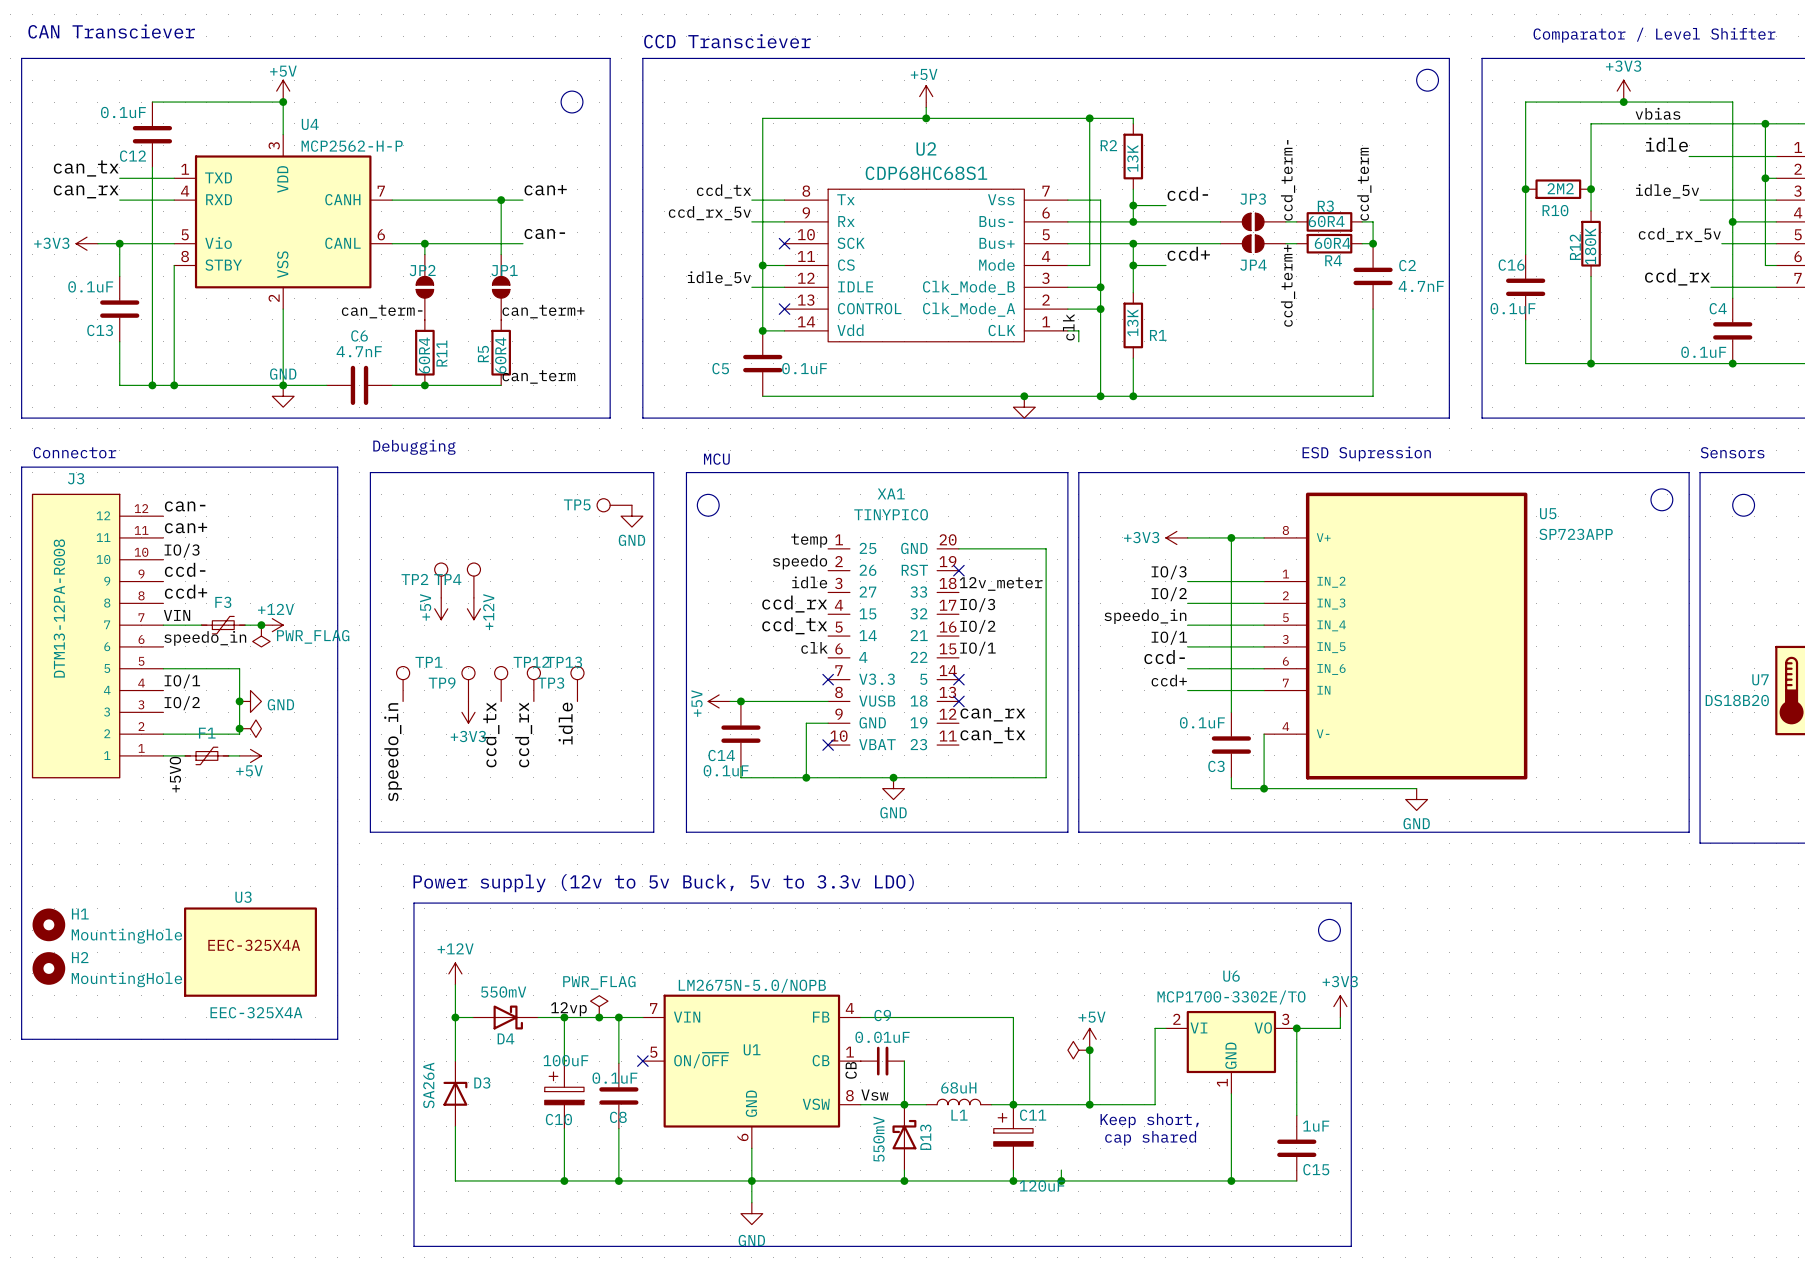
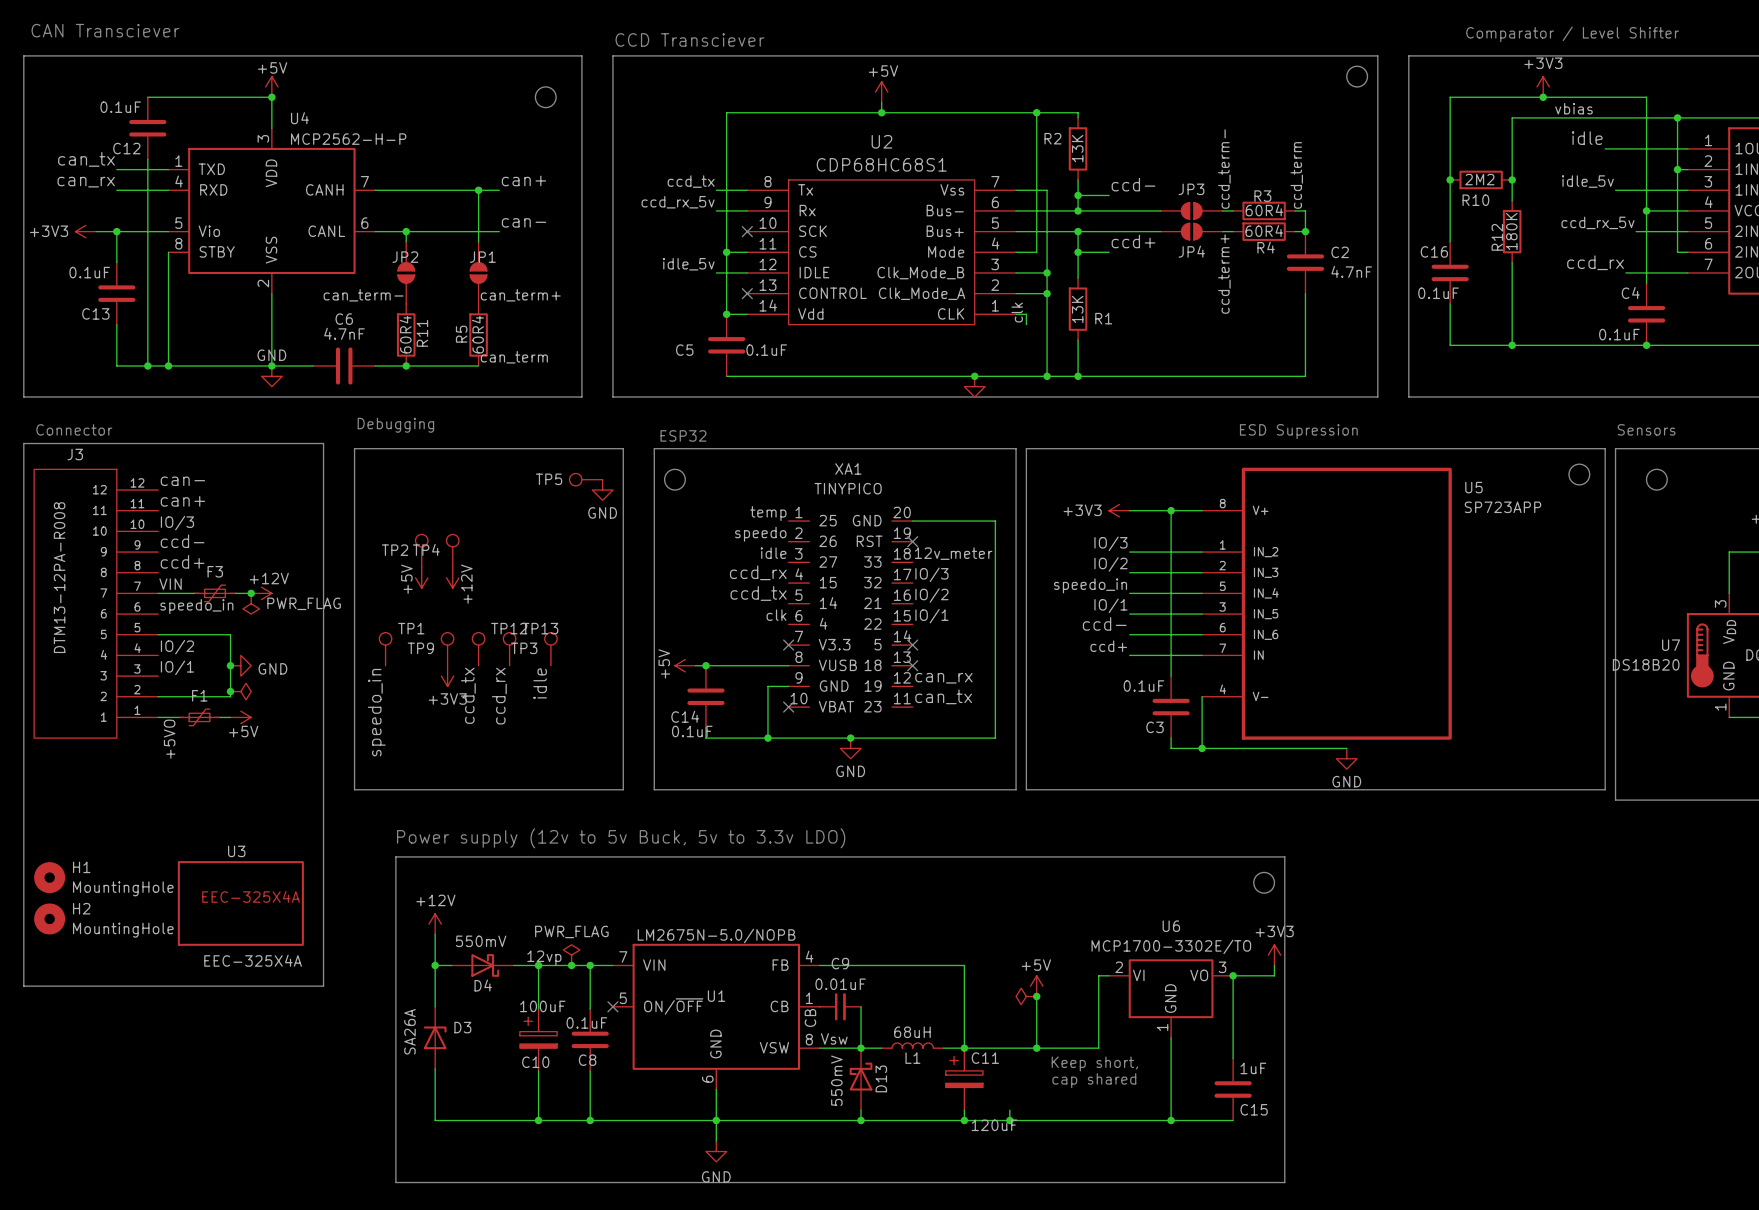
text: MCU (716, 459) -> ESP32 (683, 435)
label: IO/1 (182, 681) -> IO/2 (177, 647)
label: IO/2 (182, 703) -> IO/1 (177, 667)

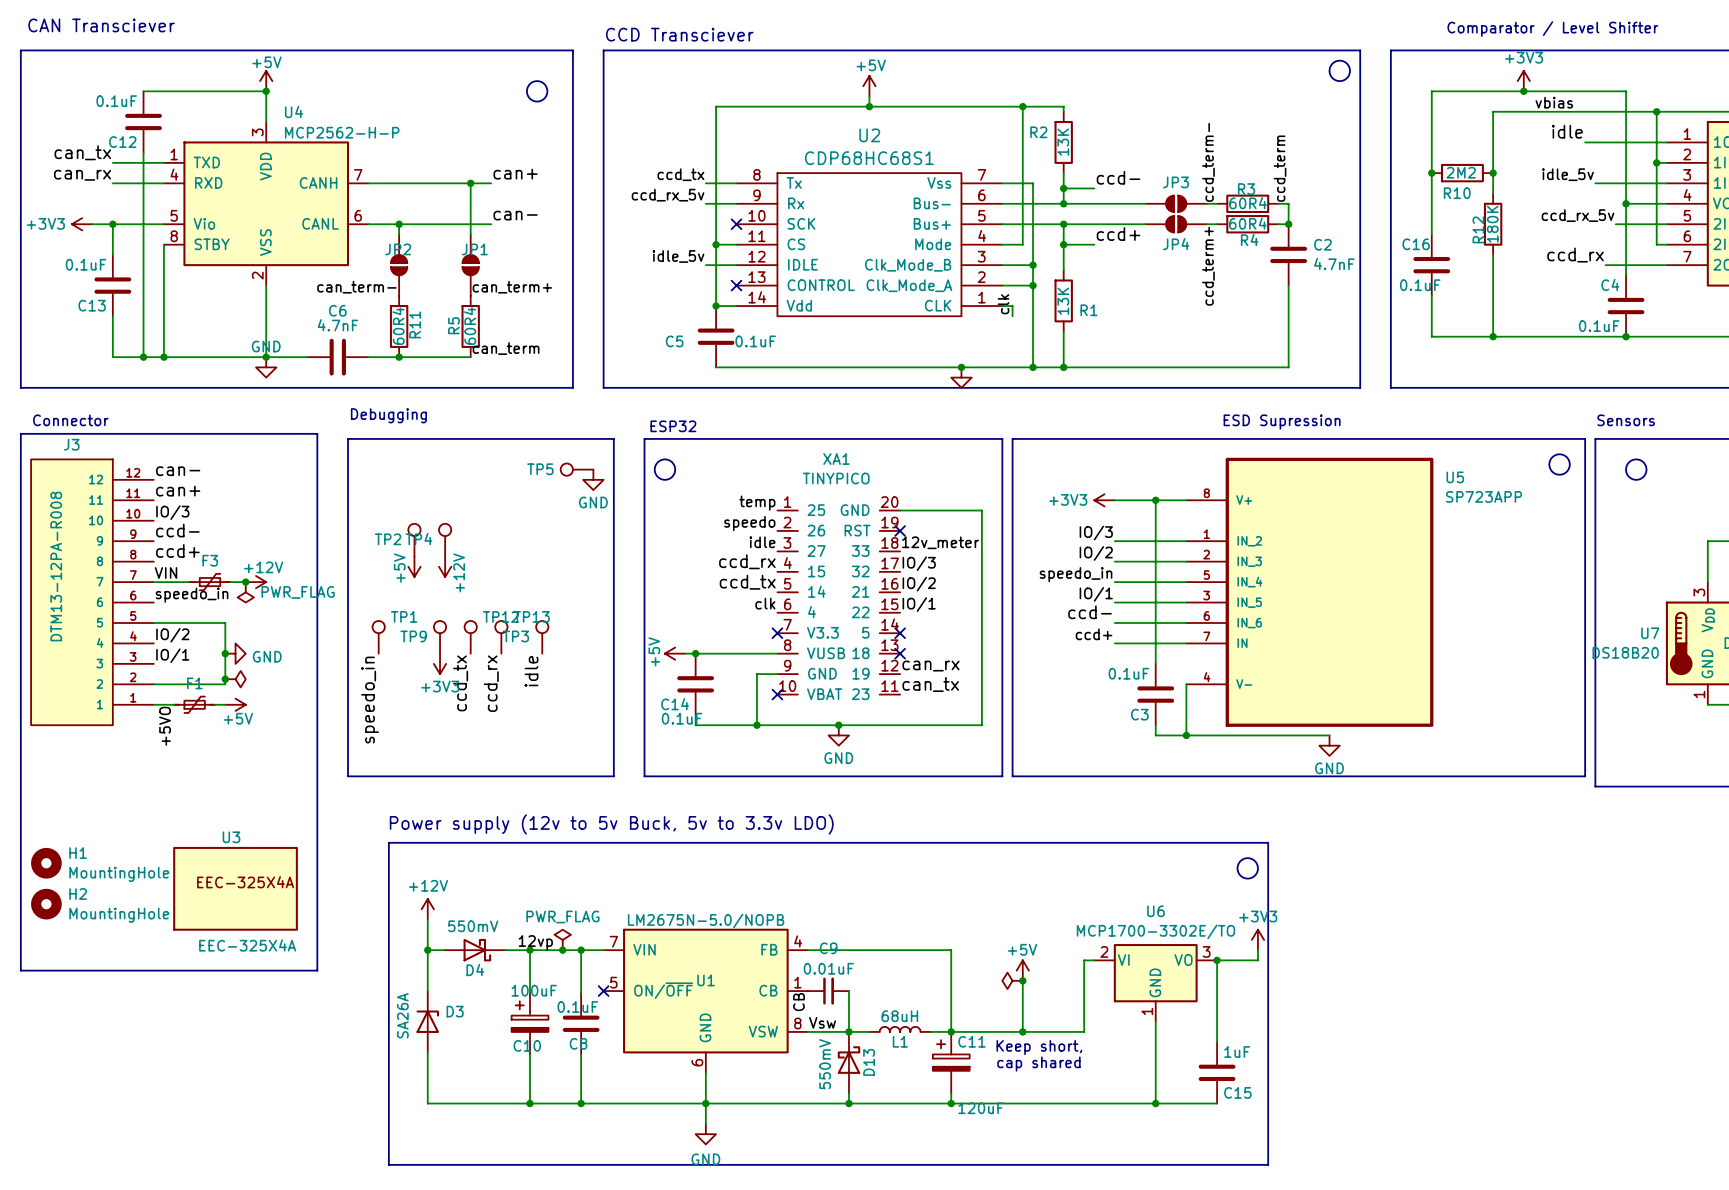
text position: Keep short, (1094, 1063) -> Keep short, (1039, 1047)
text position: cap shared (1094, 1080) -> cap shared (1038, 1064)
wire: (1009, 1110) (1009, 1120) -> none
junction: (1009, 1120) -> none

